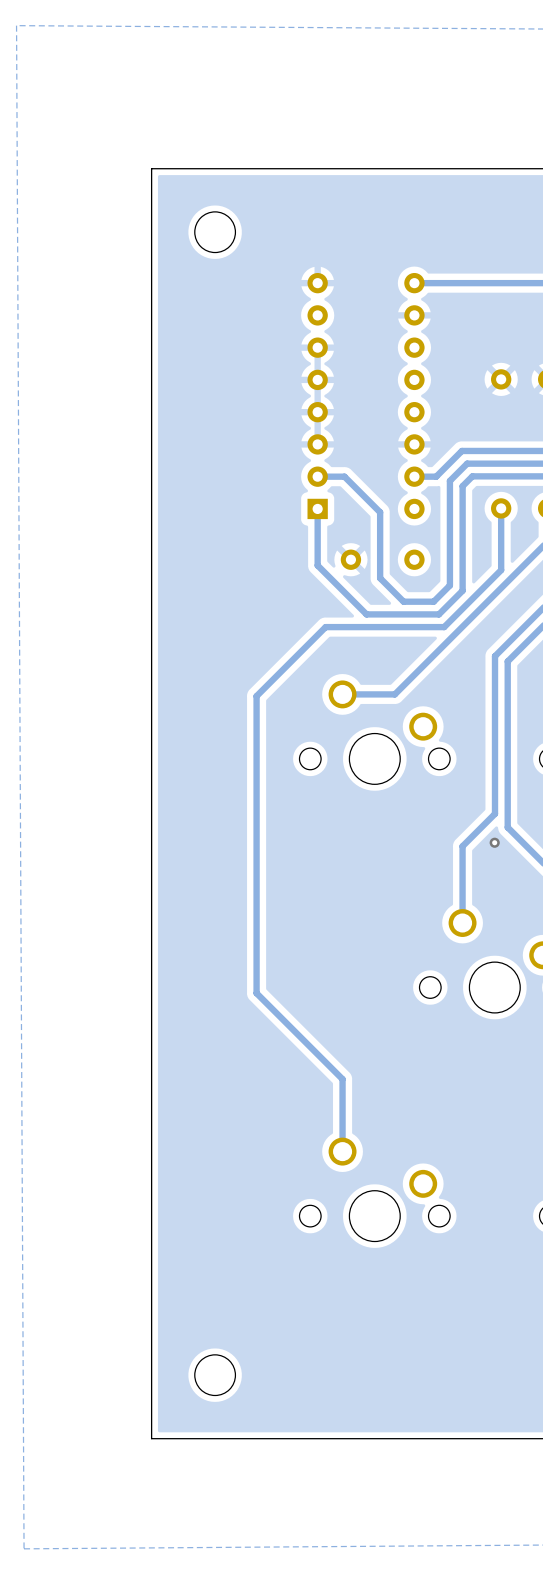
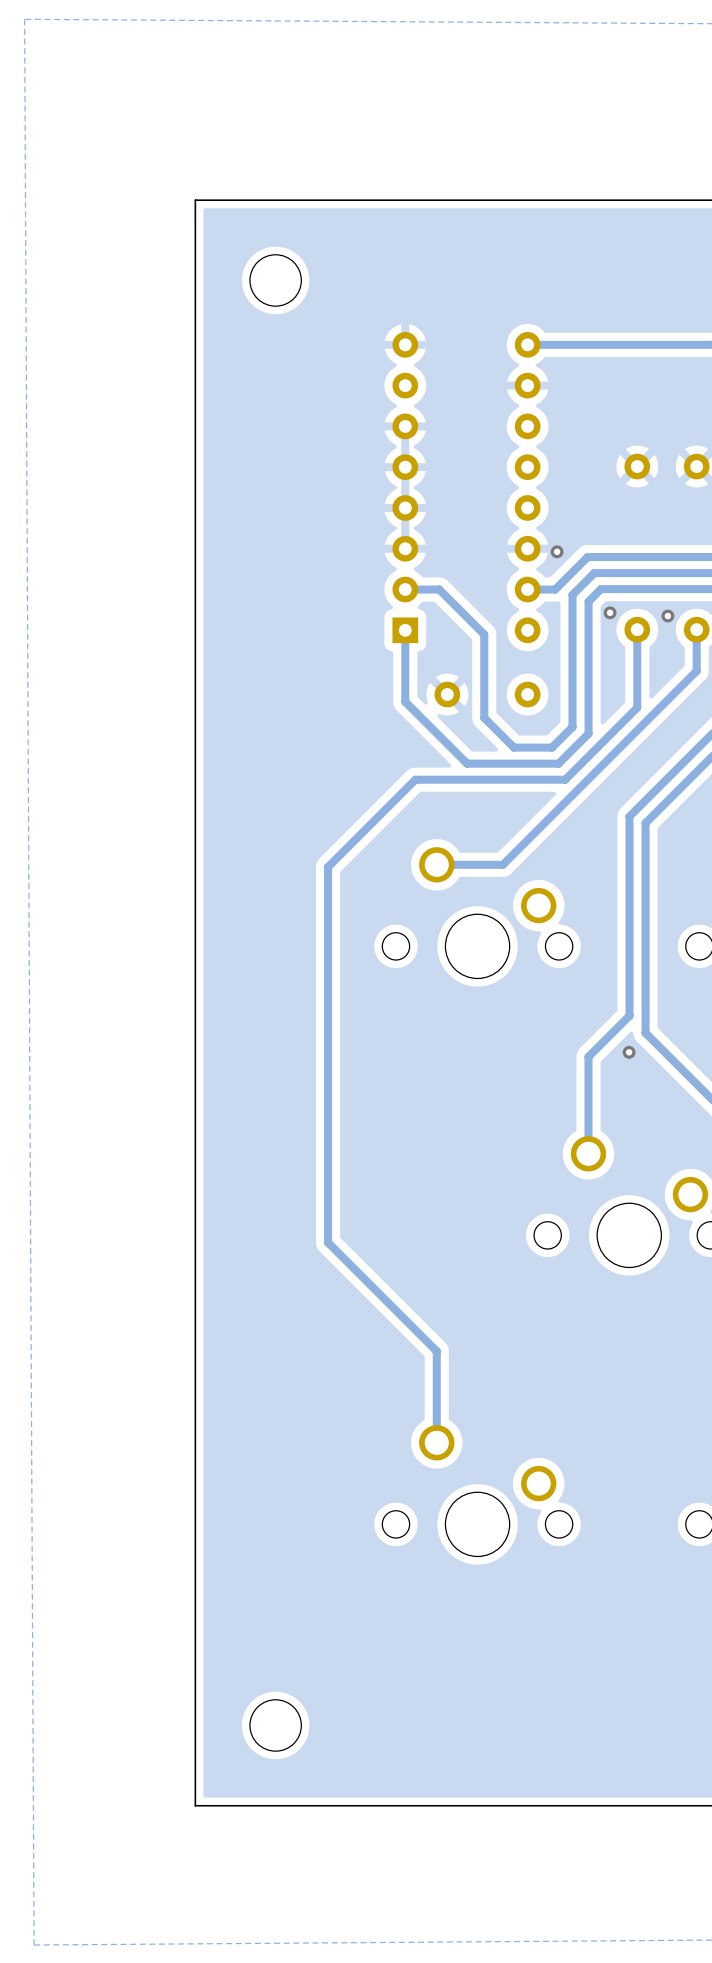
via: none -> (557, 551)
via: none -> (610, 612)
via: none -> (667, 616)

